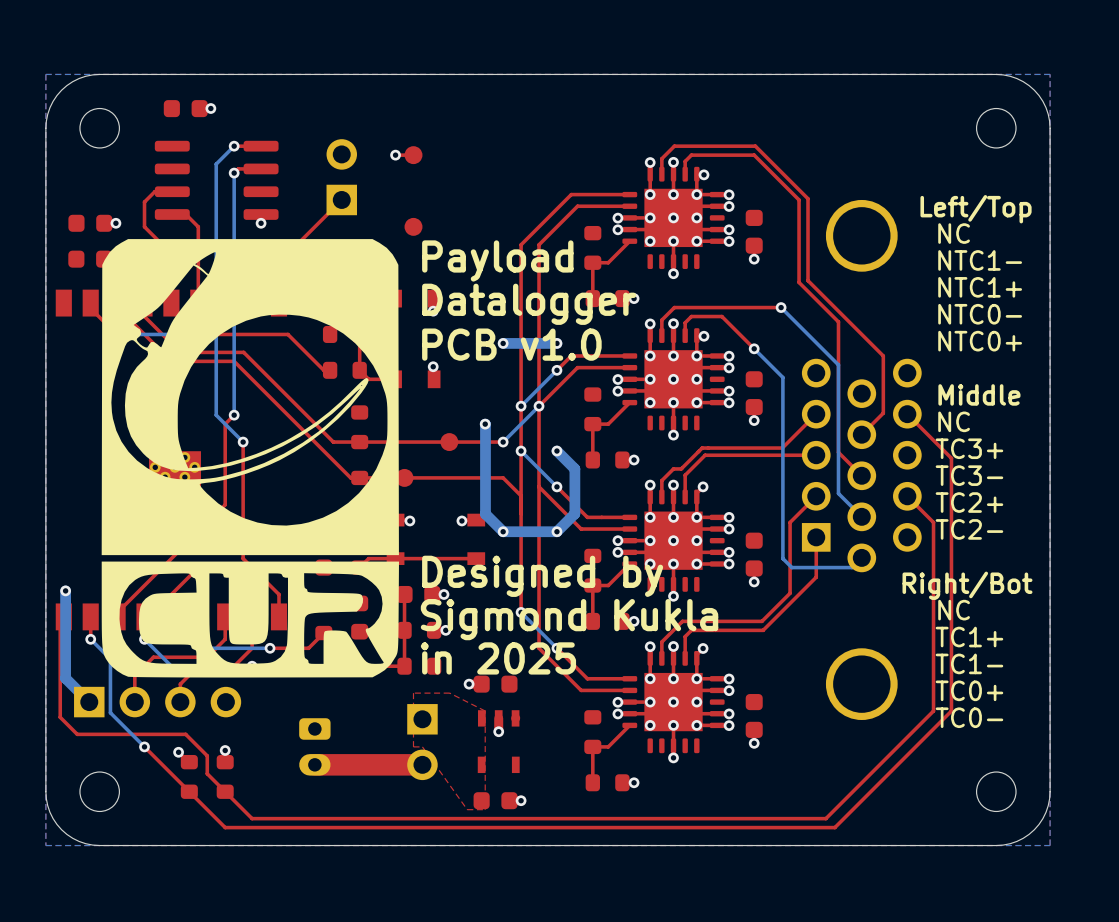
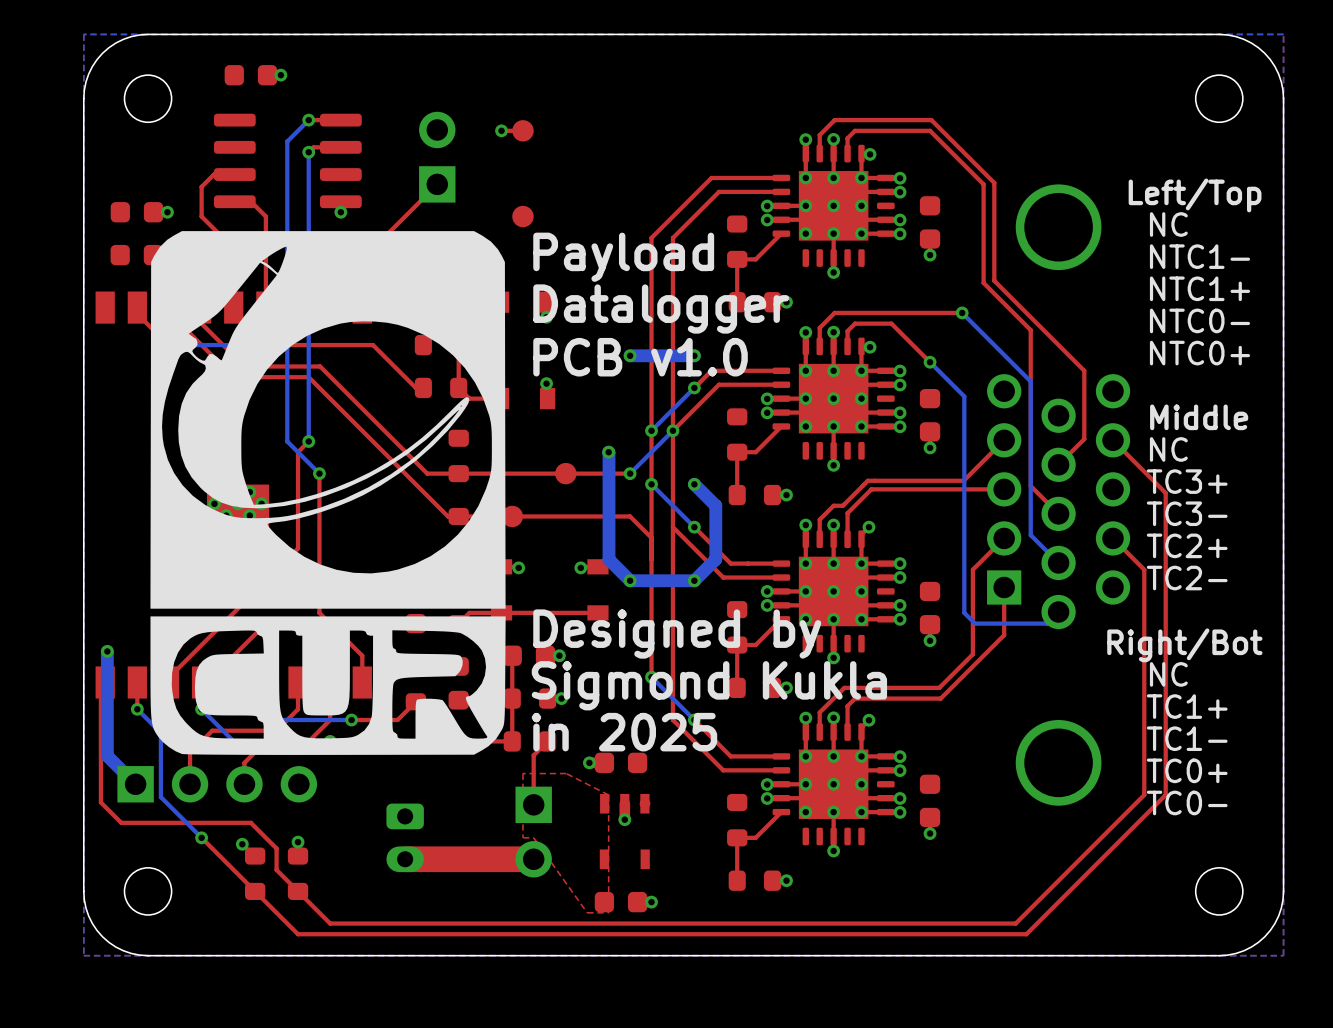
top track: none -> (547, 741) (533, 755) (533, 804)

